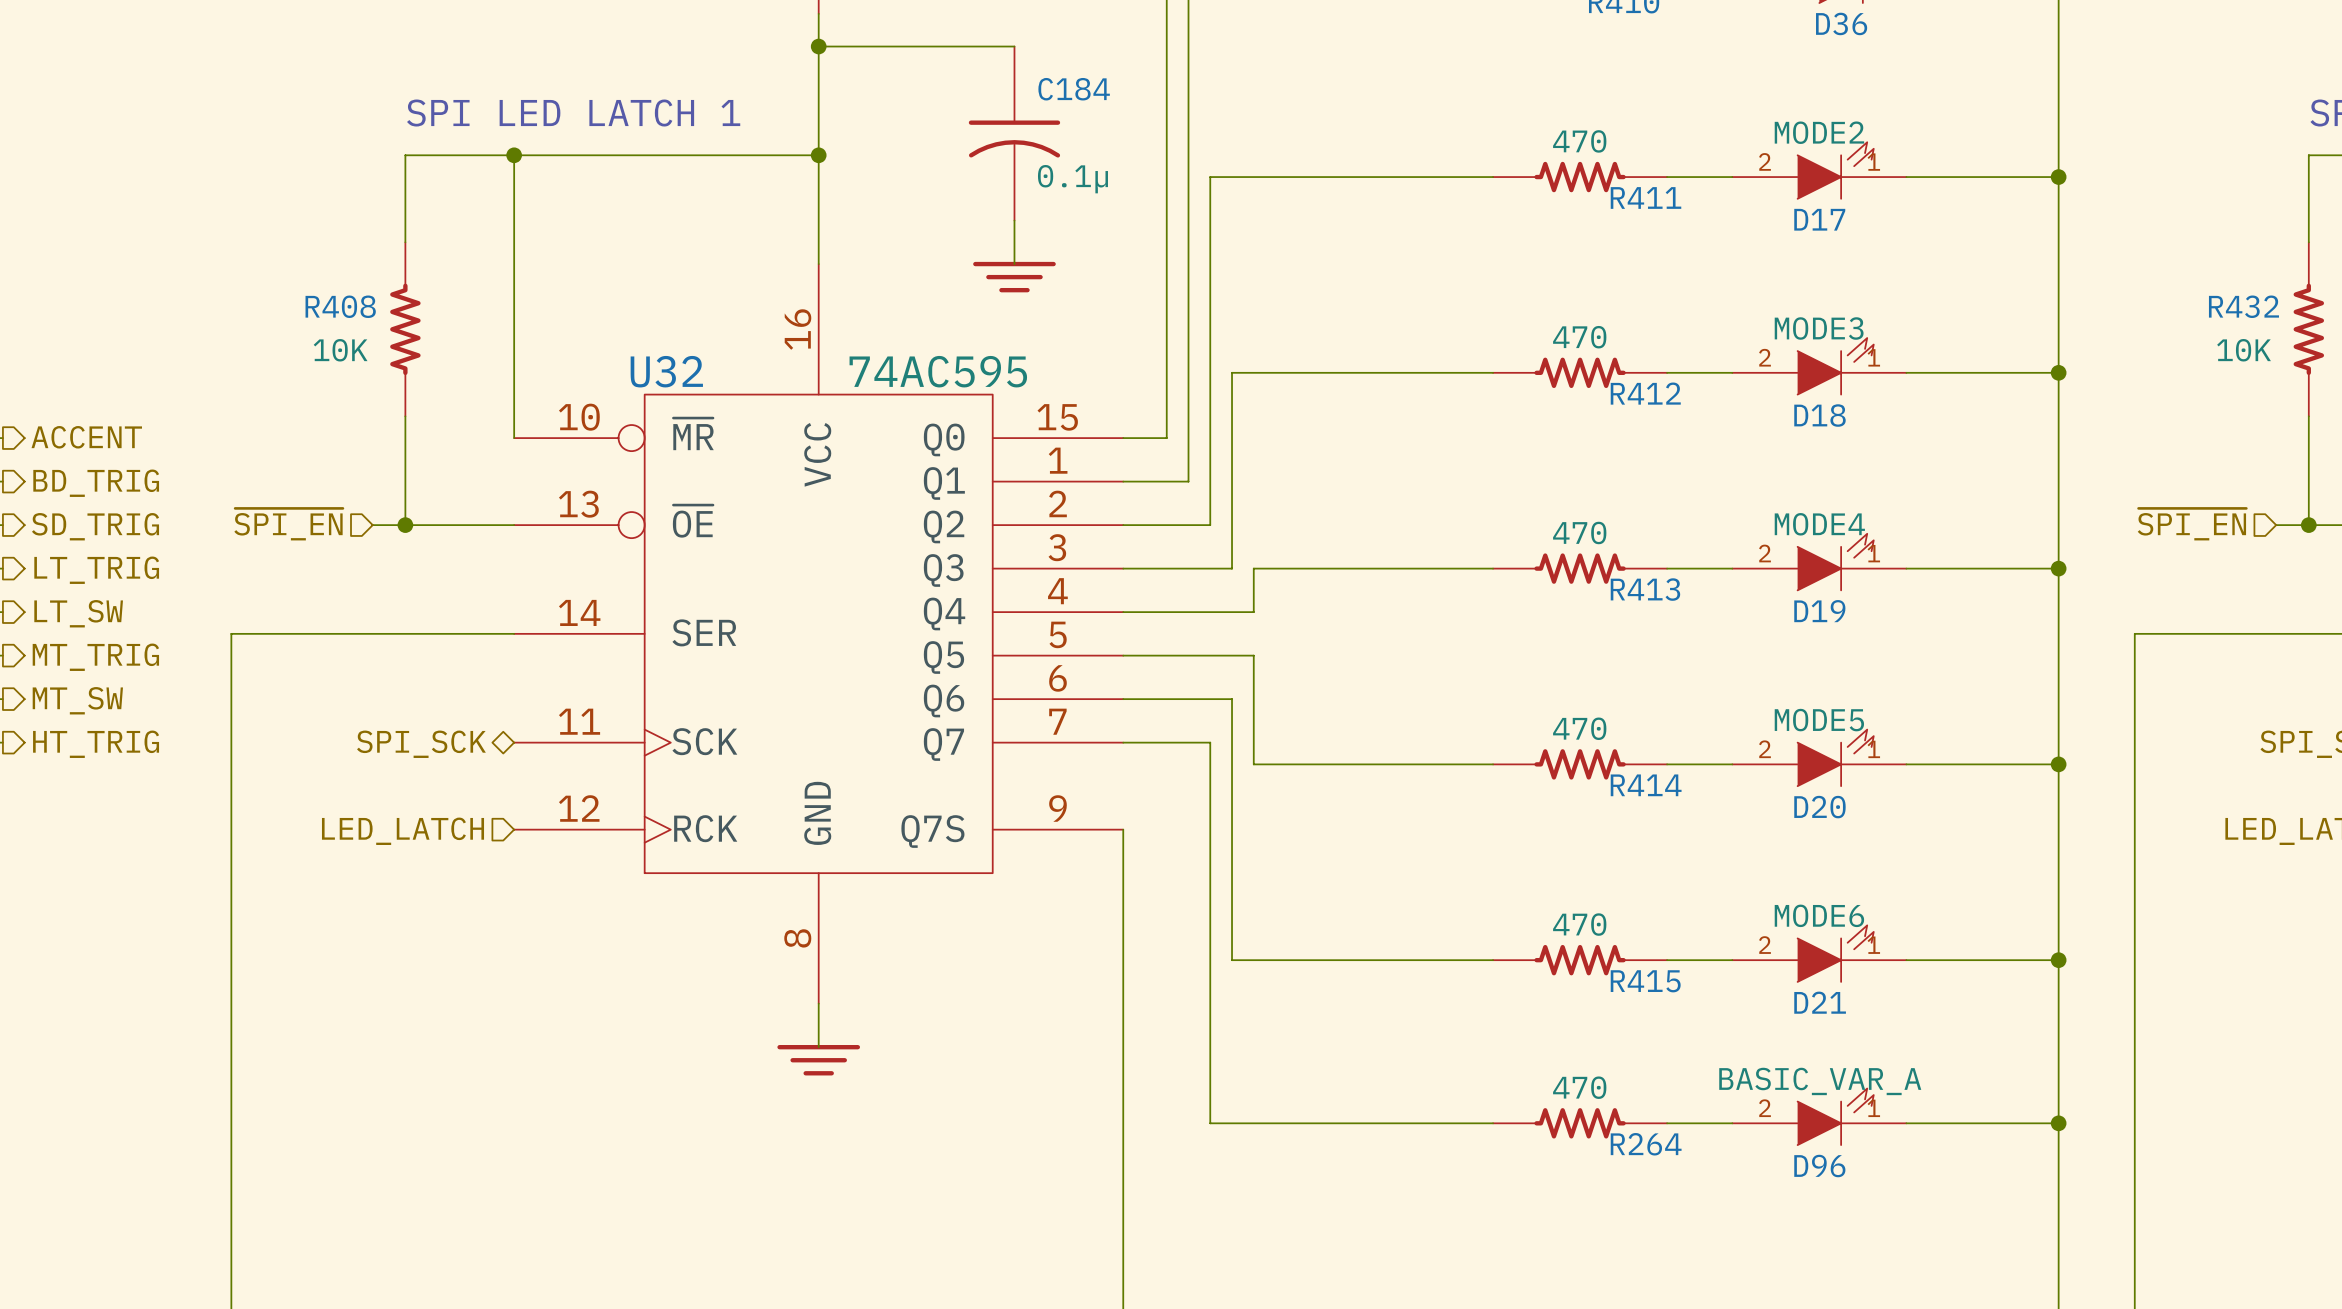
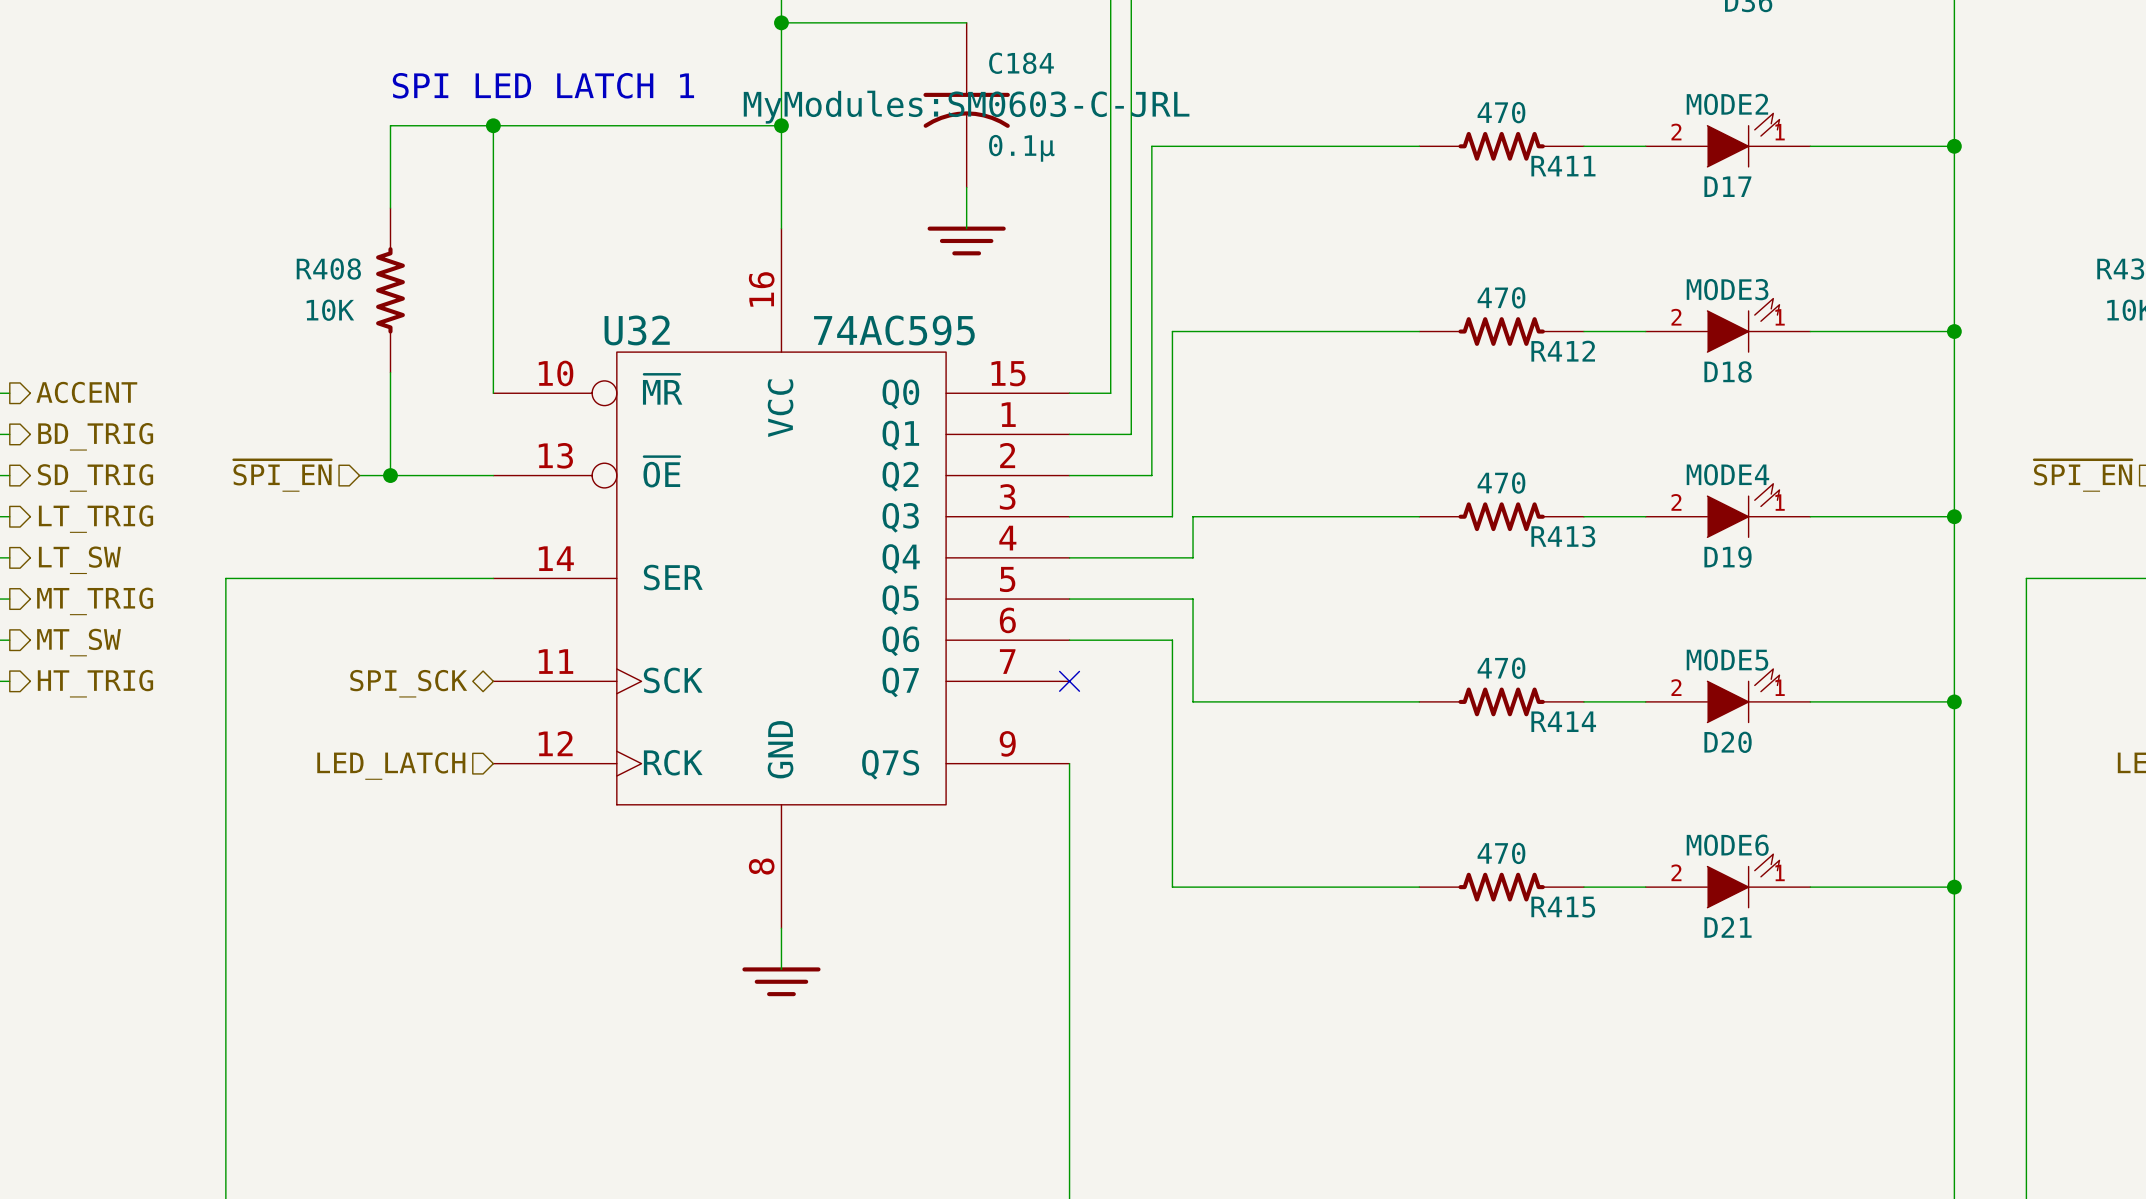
C184 text: none -> MyModules:SM0603-C-JRL (966, 107)
wire: (1123, 742) (1210, 742) (1210, 1123) (1493, 1123) -> none
no-connect mark: none -> (1069, 681)
D96: BASIC_VAR_A (1819, 1116) -> none
R264: 470 (1580, 1123) -> none
wire: (1667, 1123) (1732, 1123) -> none
wire: (1906, 1123) (2058, 1123) -> none
junction: (2058, 1123) -> none

